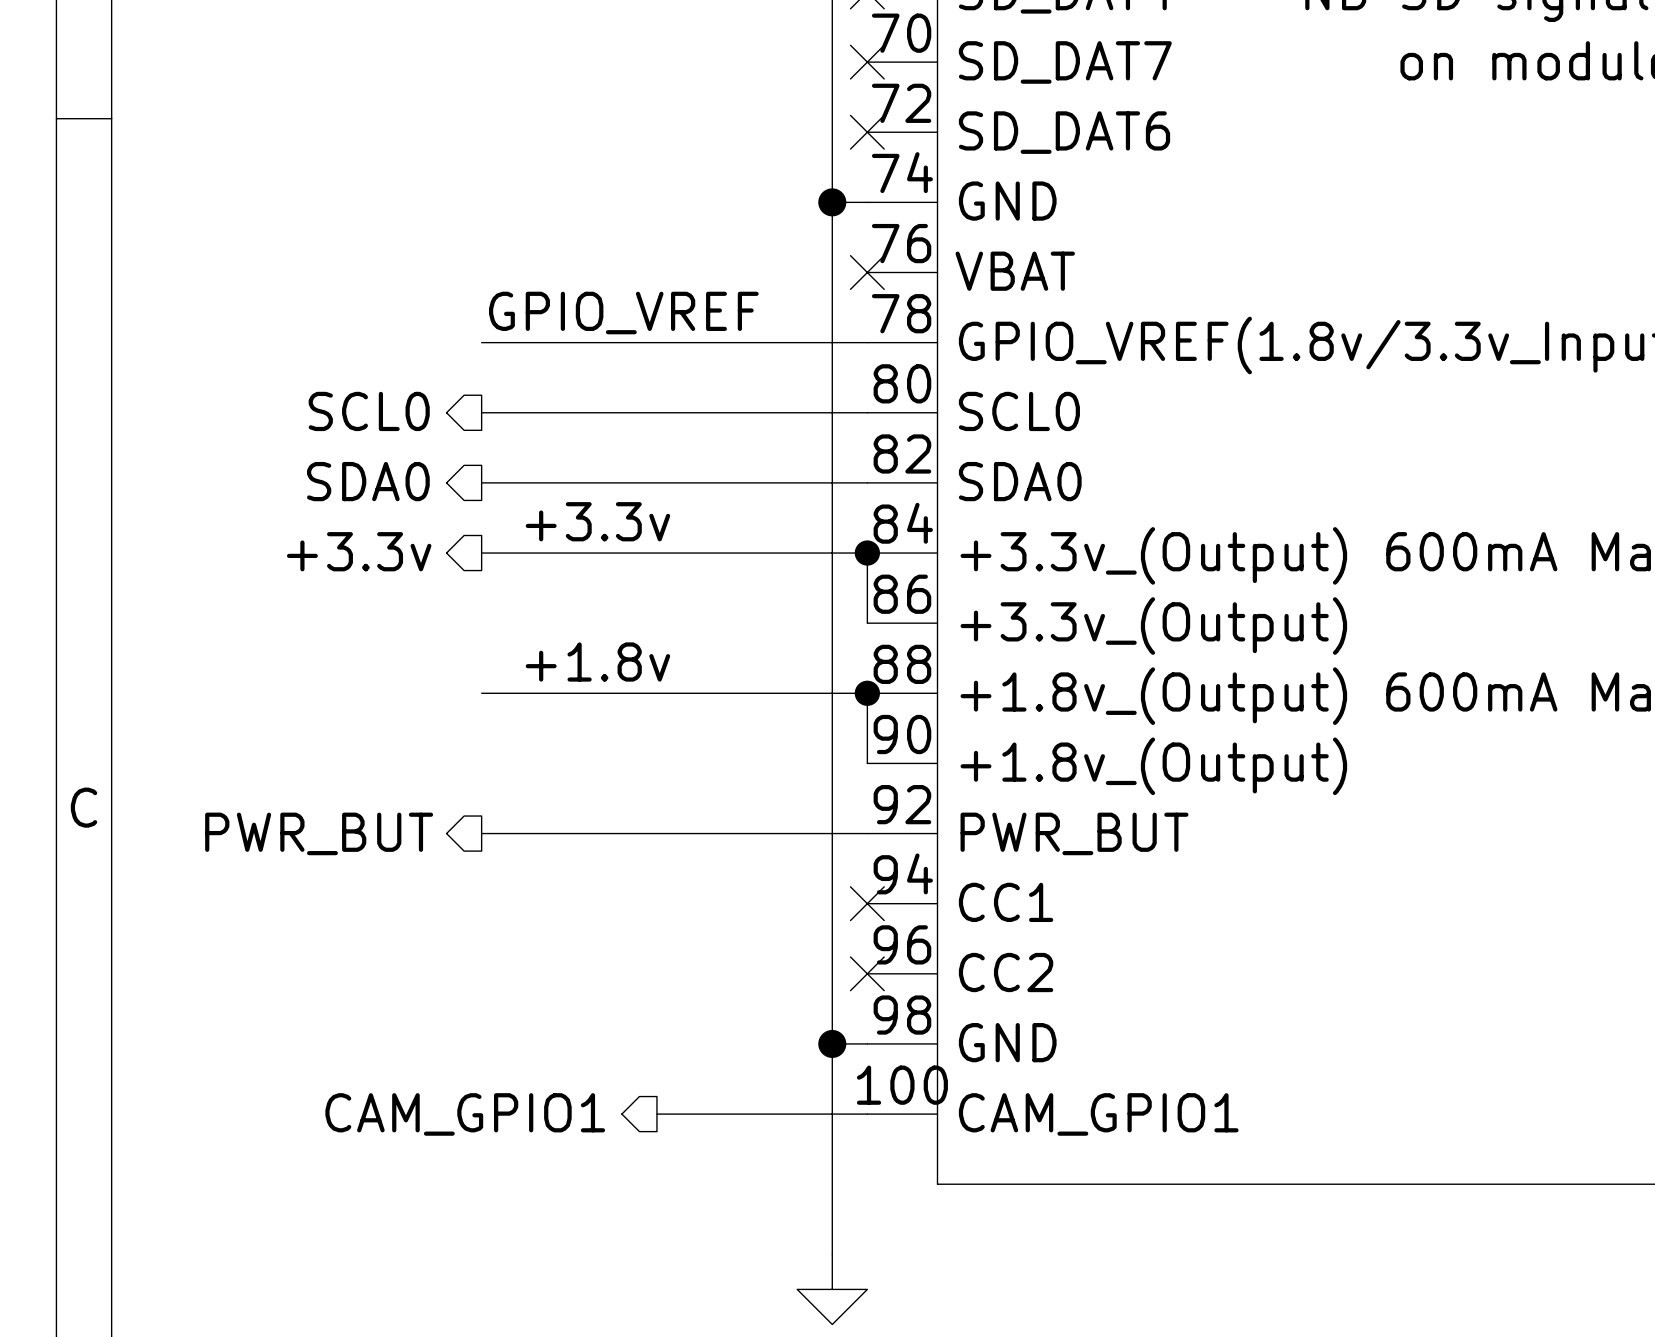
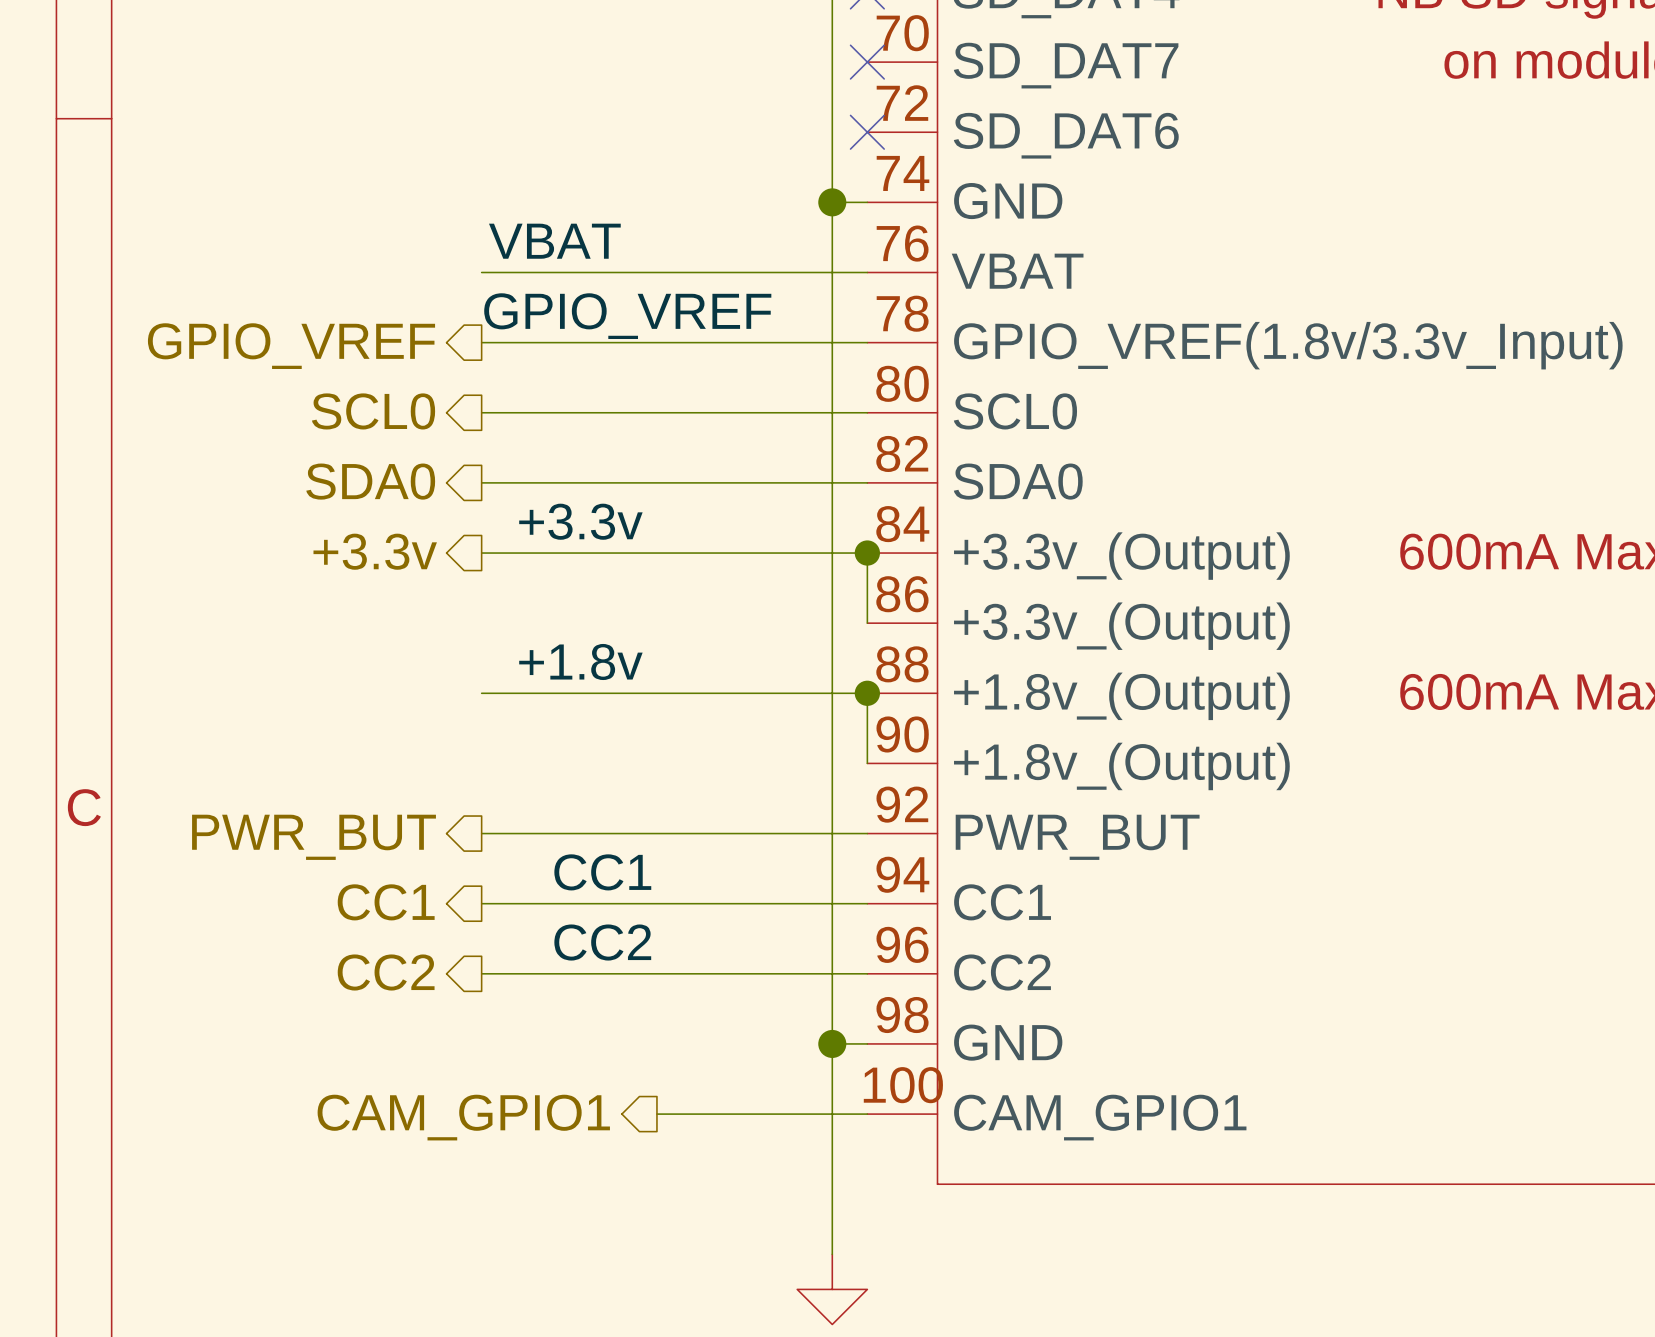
label: none -> VBAT (554, 241)
wire: none -> (481, 272) (867, 272)
no-connect mark: (867, 272) -> none
hierarchical label: none -> GPIO_VREF (291, 346)
label: none -> CC1 (602, 872)
hierarchical label: none -> CC1 (386, 902)
wire: none -> (481, 903) (867, 903)
no-connect mark: (867, 903) -> none
label: none -> CC2 (602, 942)
hierarchical label: none -> CC2 (386, 972)
wire: none -> (481, 973) (867, 973)
no-connect mark: (867, 973) -> none

